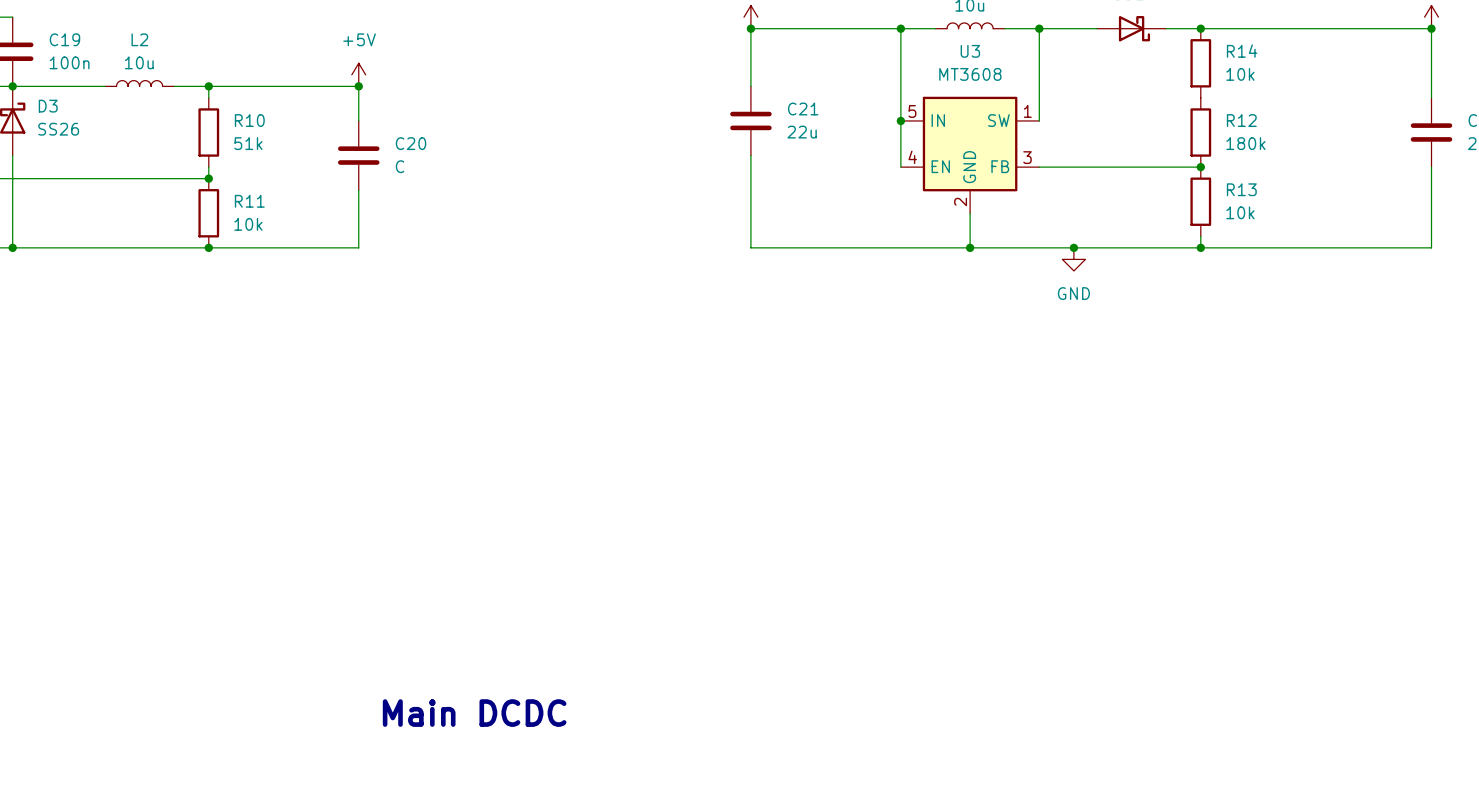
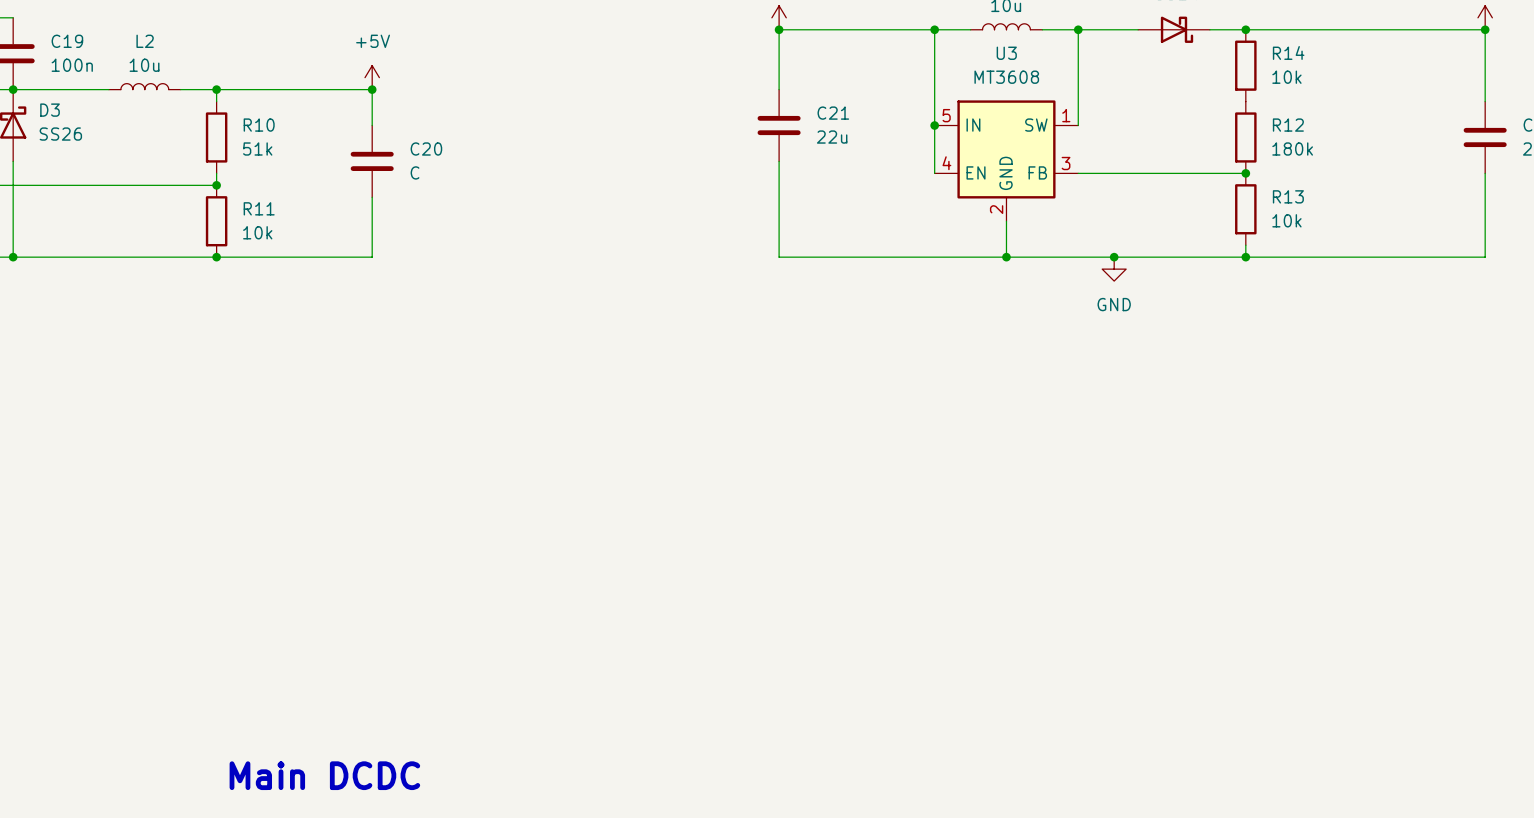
text position: Main DCDC (474, 713) -> Main DCDC (324, 775)

